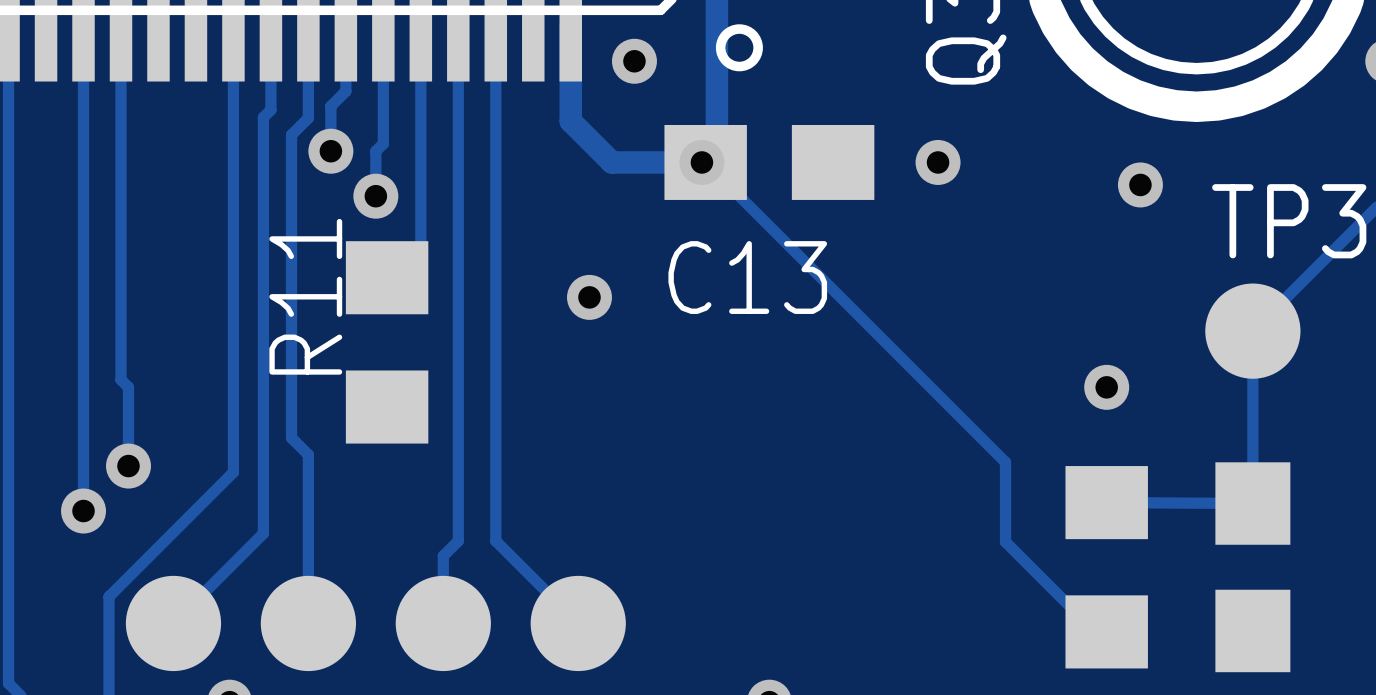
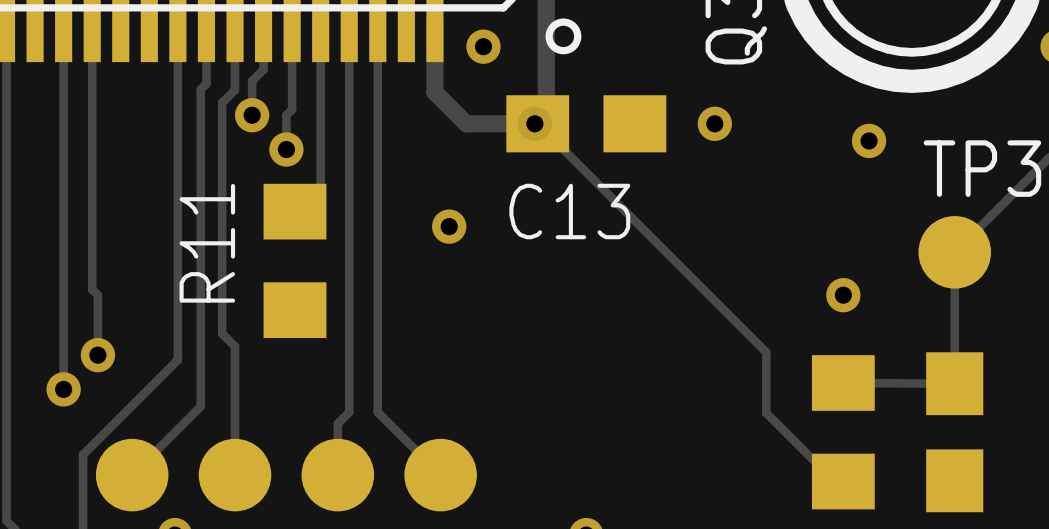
R11 name position: R11 (305, 296) -> R11 (207, 243)

